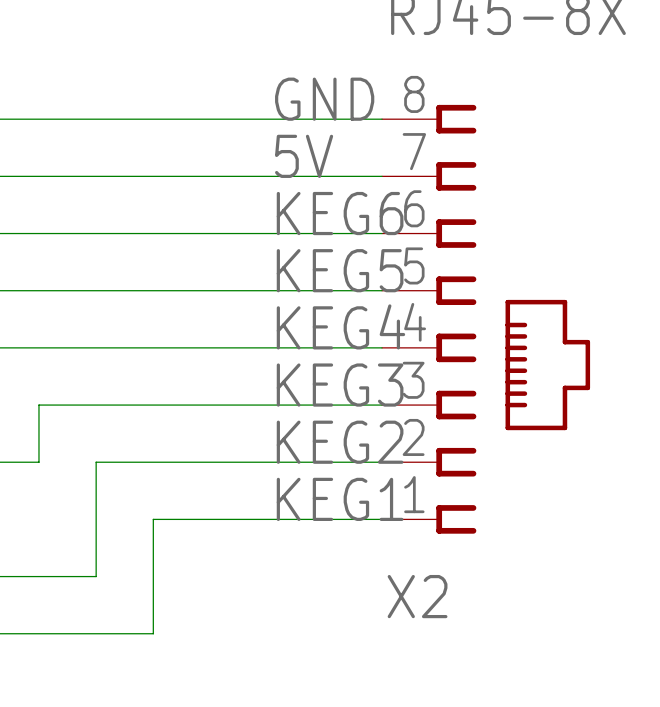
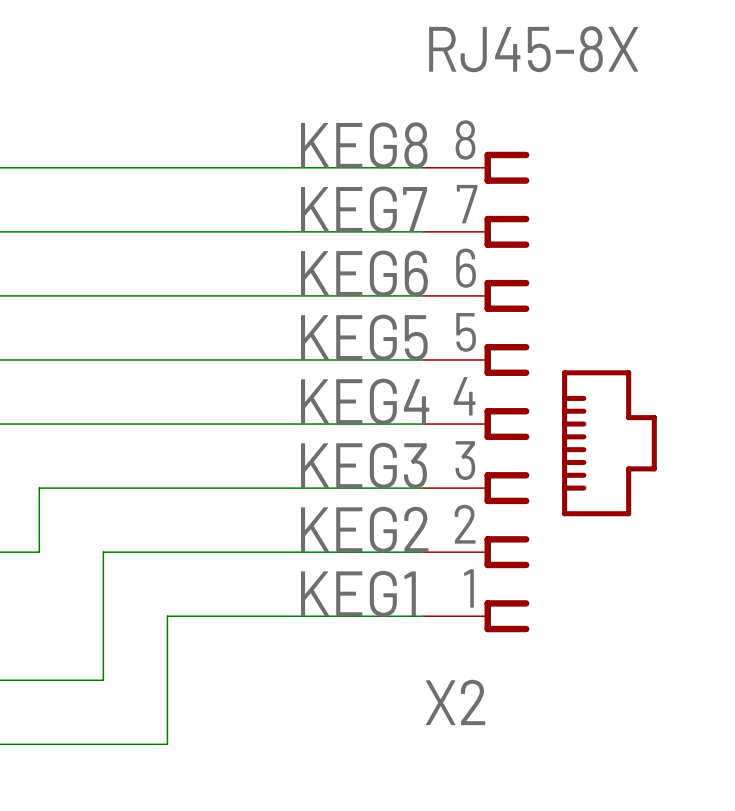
label: GND (324, 99) -> KEG8 (364, 145)
label: 5V (304, 156) -> KEG7 (363, 209)

